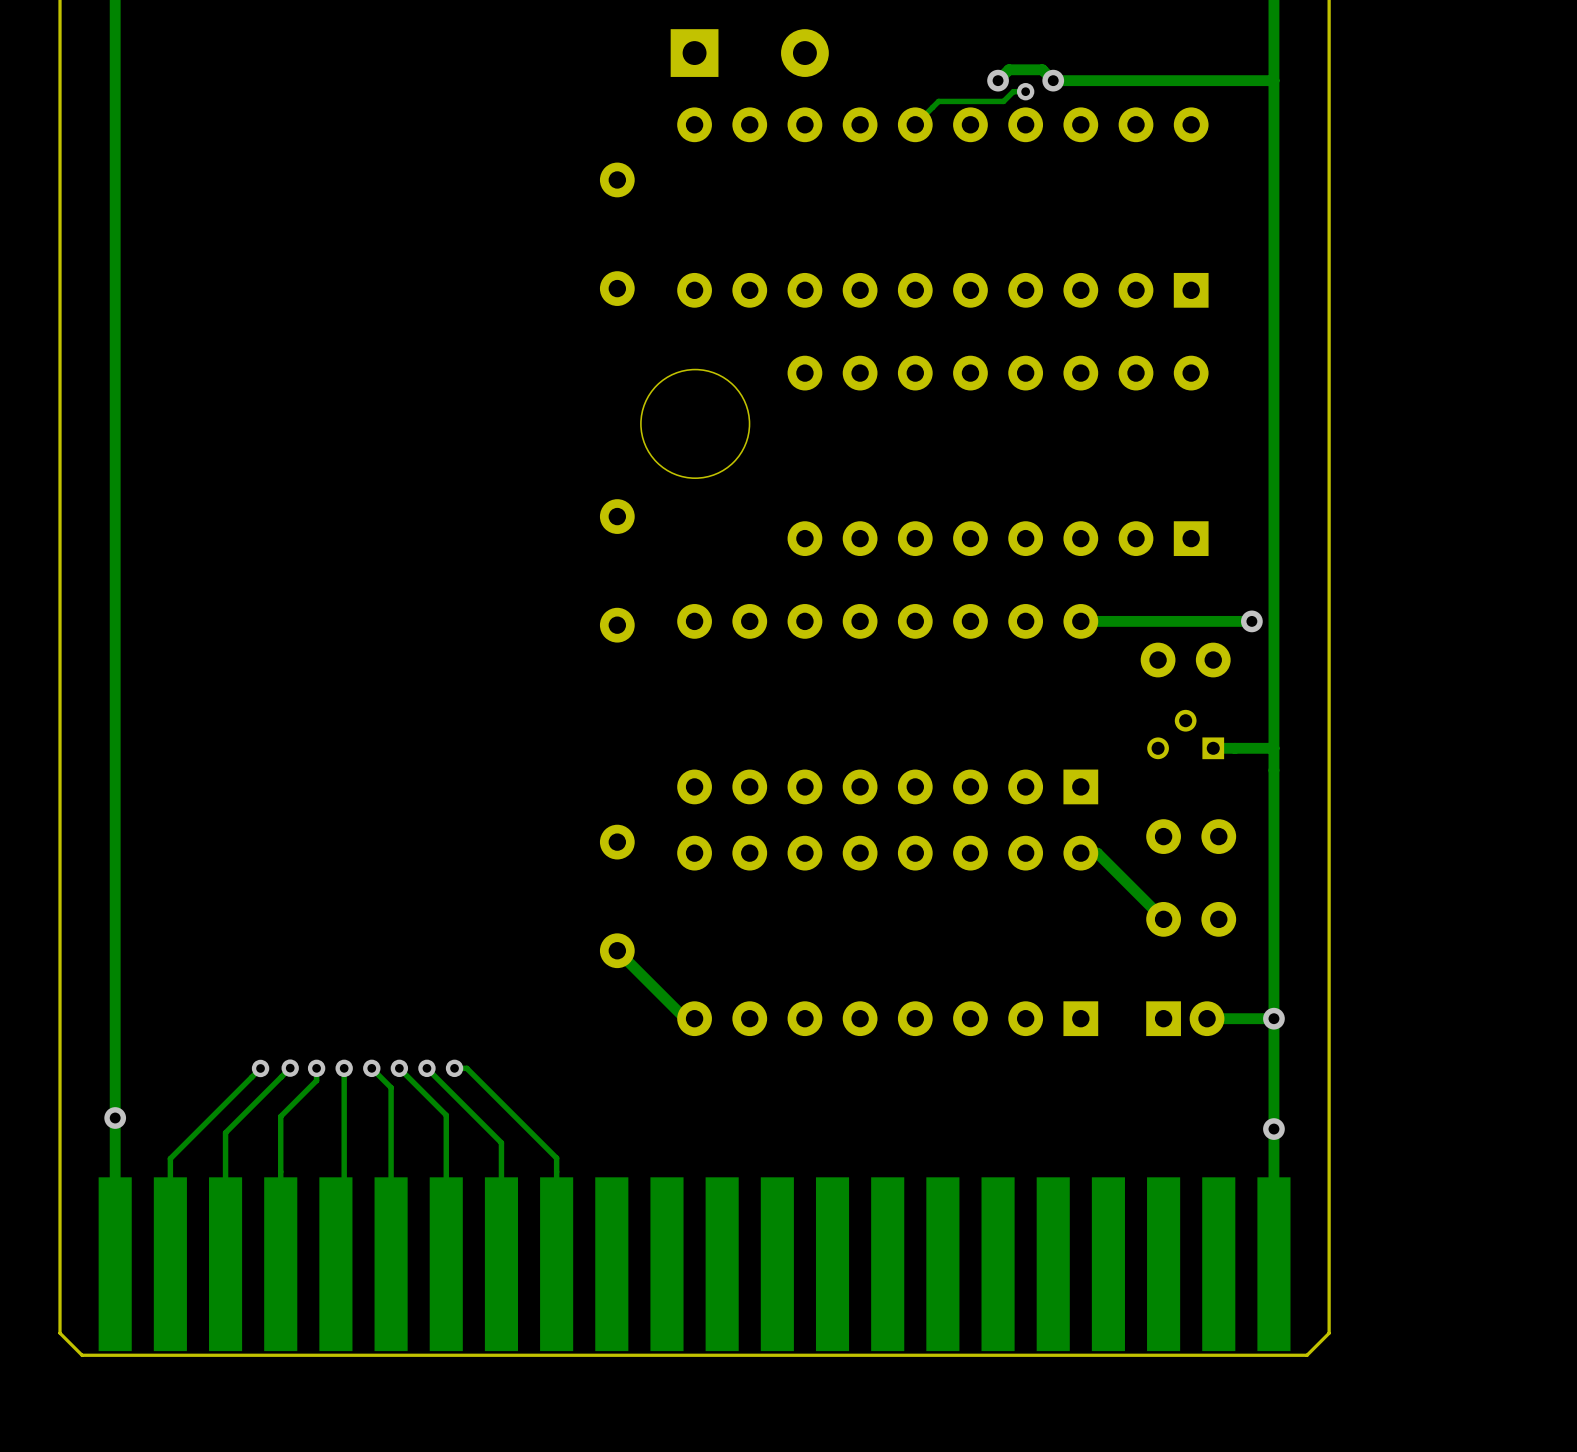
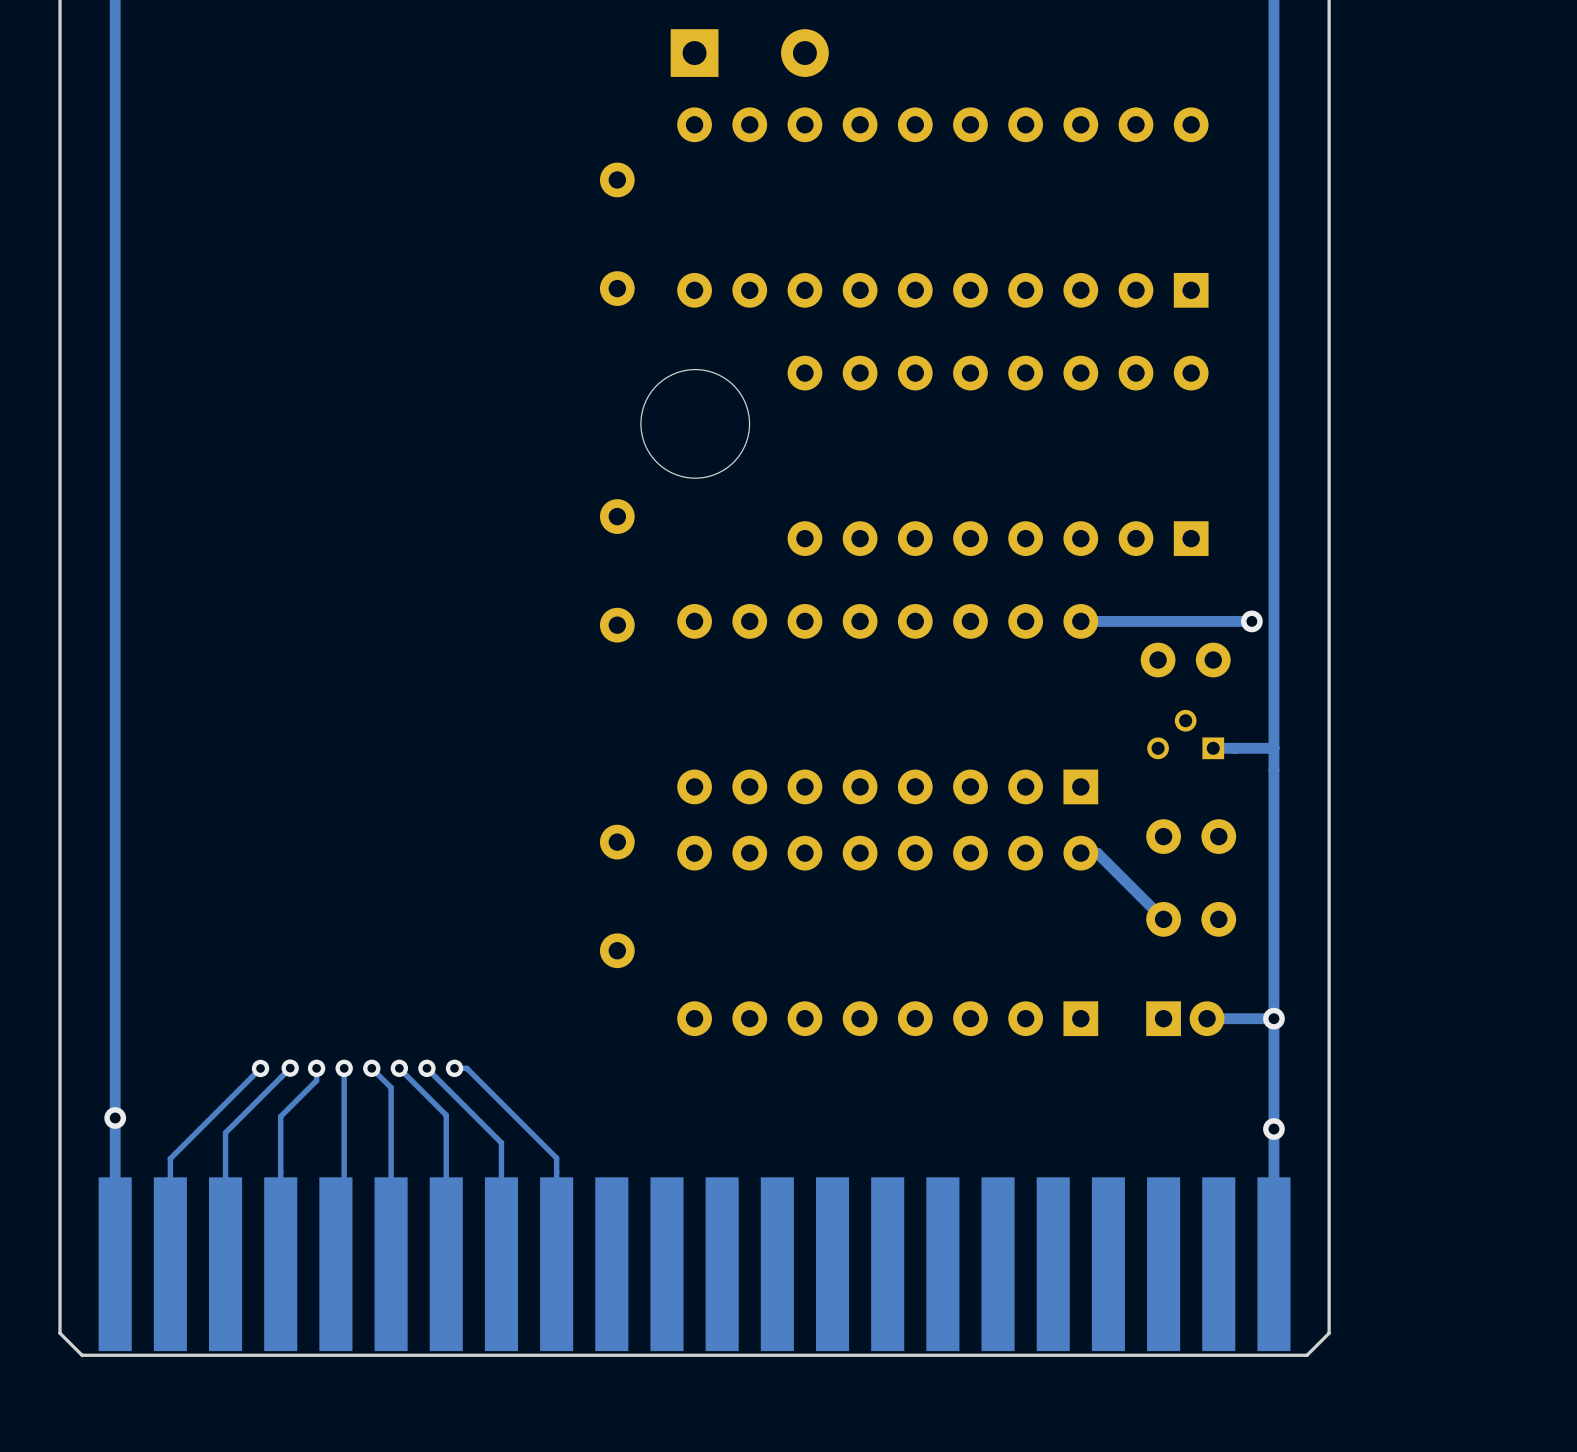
via: (998, 80) -> none
via: (1053, 80) -> none
track: (1273, 80) (1053, 80) (1042, 69) (1008, 69) (998, 80) -> none
track: (1025, 91) (1013, 91) (1003, 101) (938, 101) (915, 124) -> none
via: (1025, 91) -> none
track: (617, 950) (685, 1018) (694, 1018) -> none

